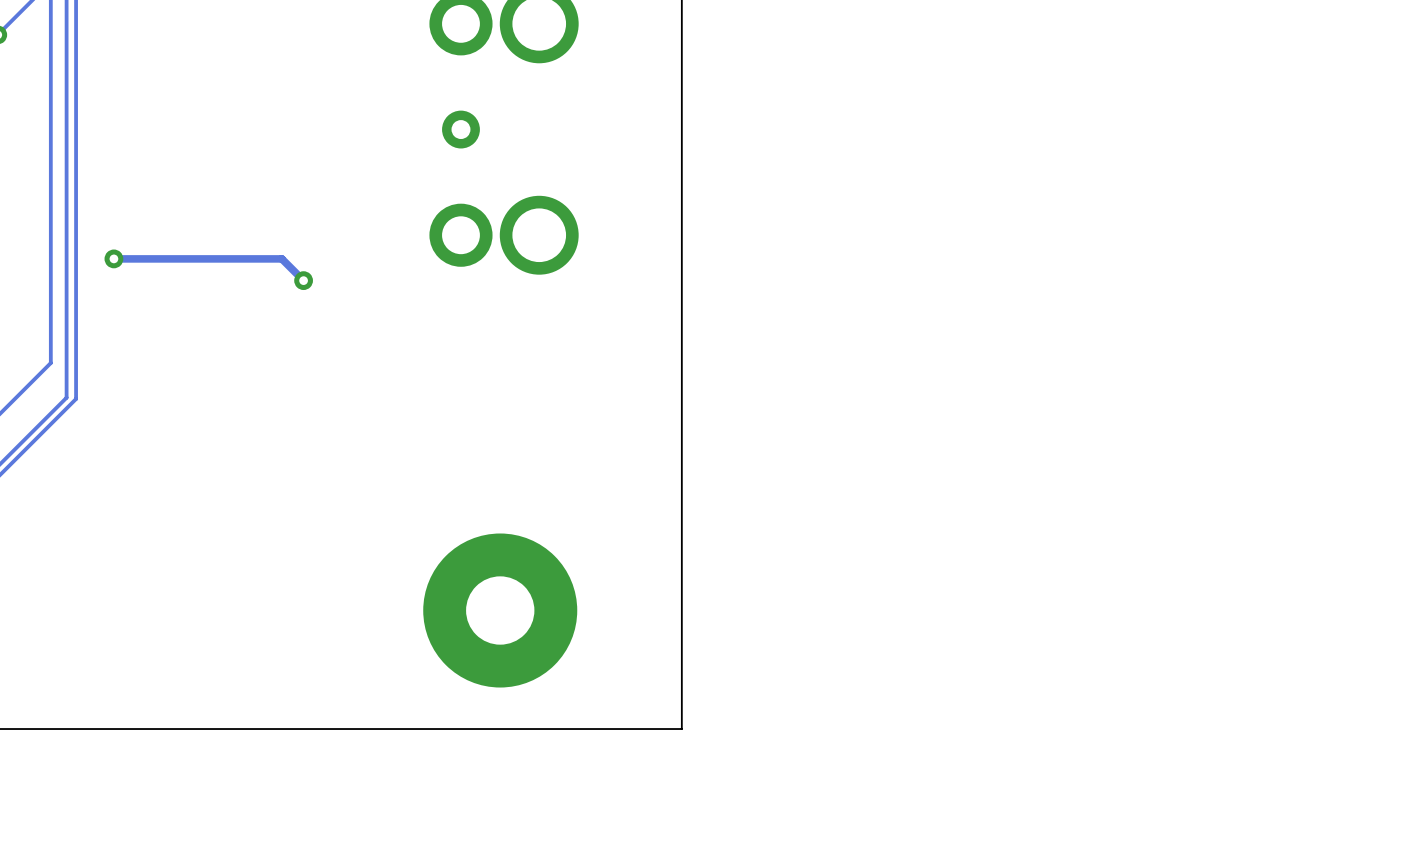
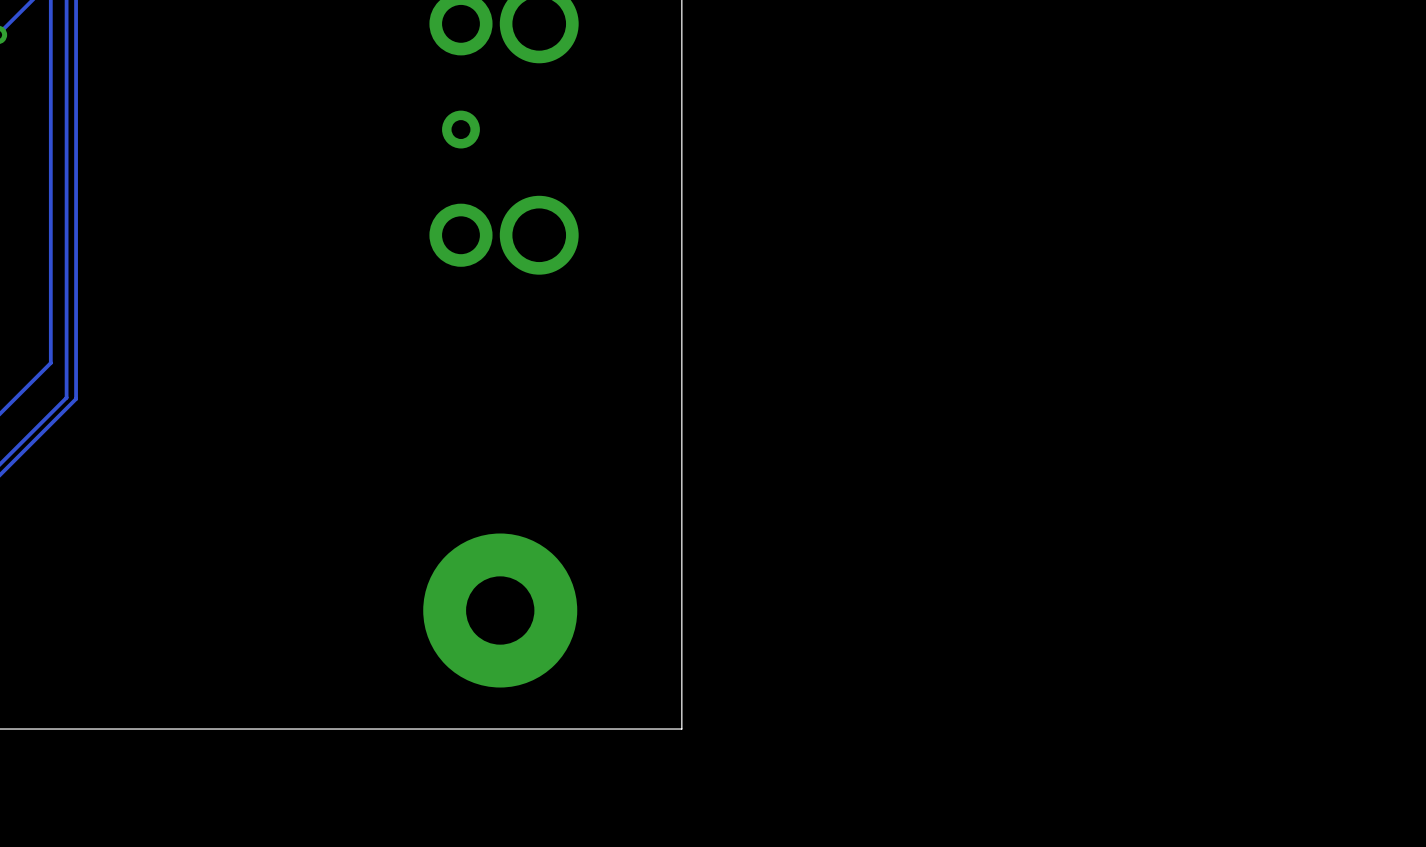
track: (113, 258) (281, 258) (303, 280) -> none
via: (113, 258) -> none
via: (303, 280) -> none

